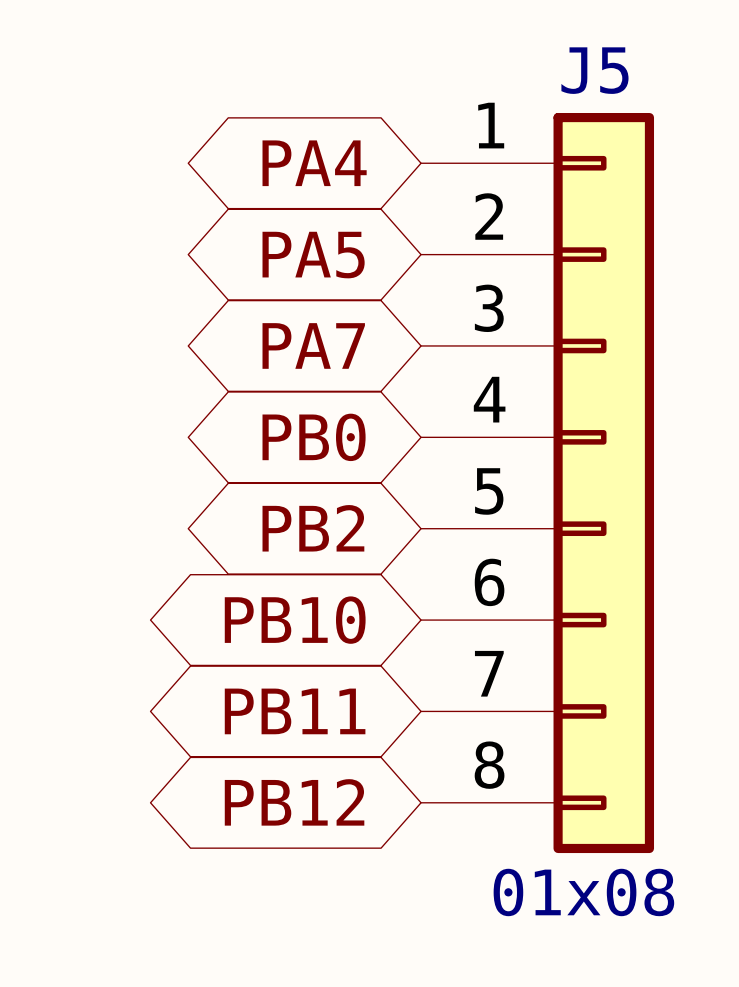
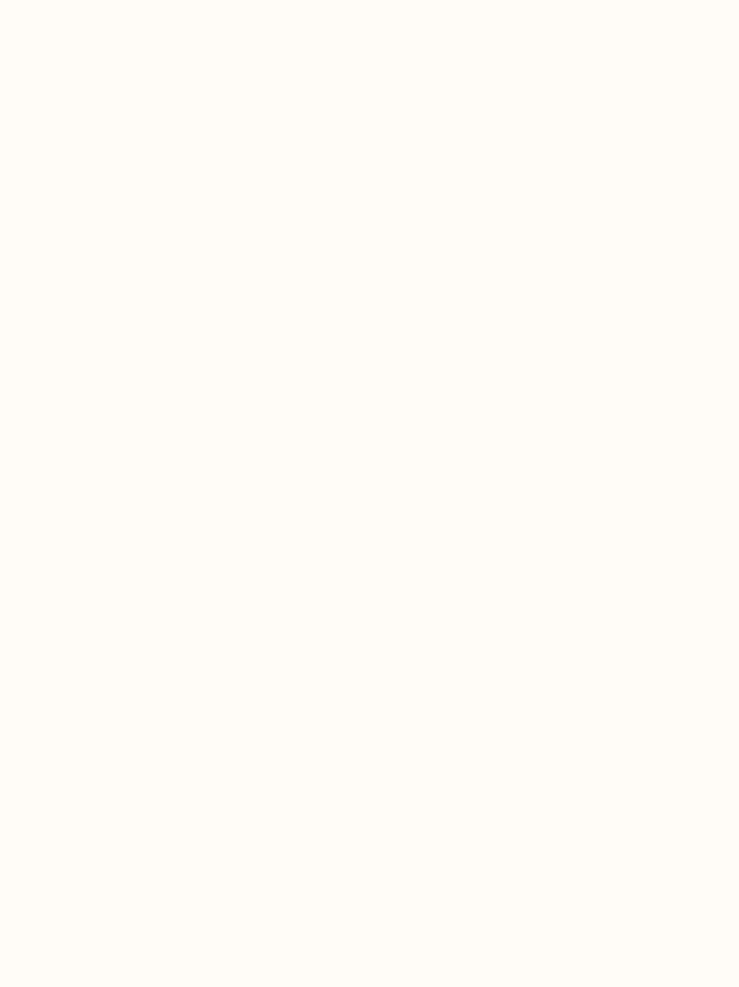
global label: PA4 (314, 163) -> none
global label: PA5 (313, 255) -> none
global label: PA7 (313, 345) -> none
global label: PB0 (314, 437) -> none
J5: 01x08 (537, 483) -> none
global label: PB2 (313, 528) -> none
global label: PB10 (295, 620) -> none
global label: PB11 (295, 711) -> none
global label: PB12 (294, 802) -> none

